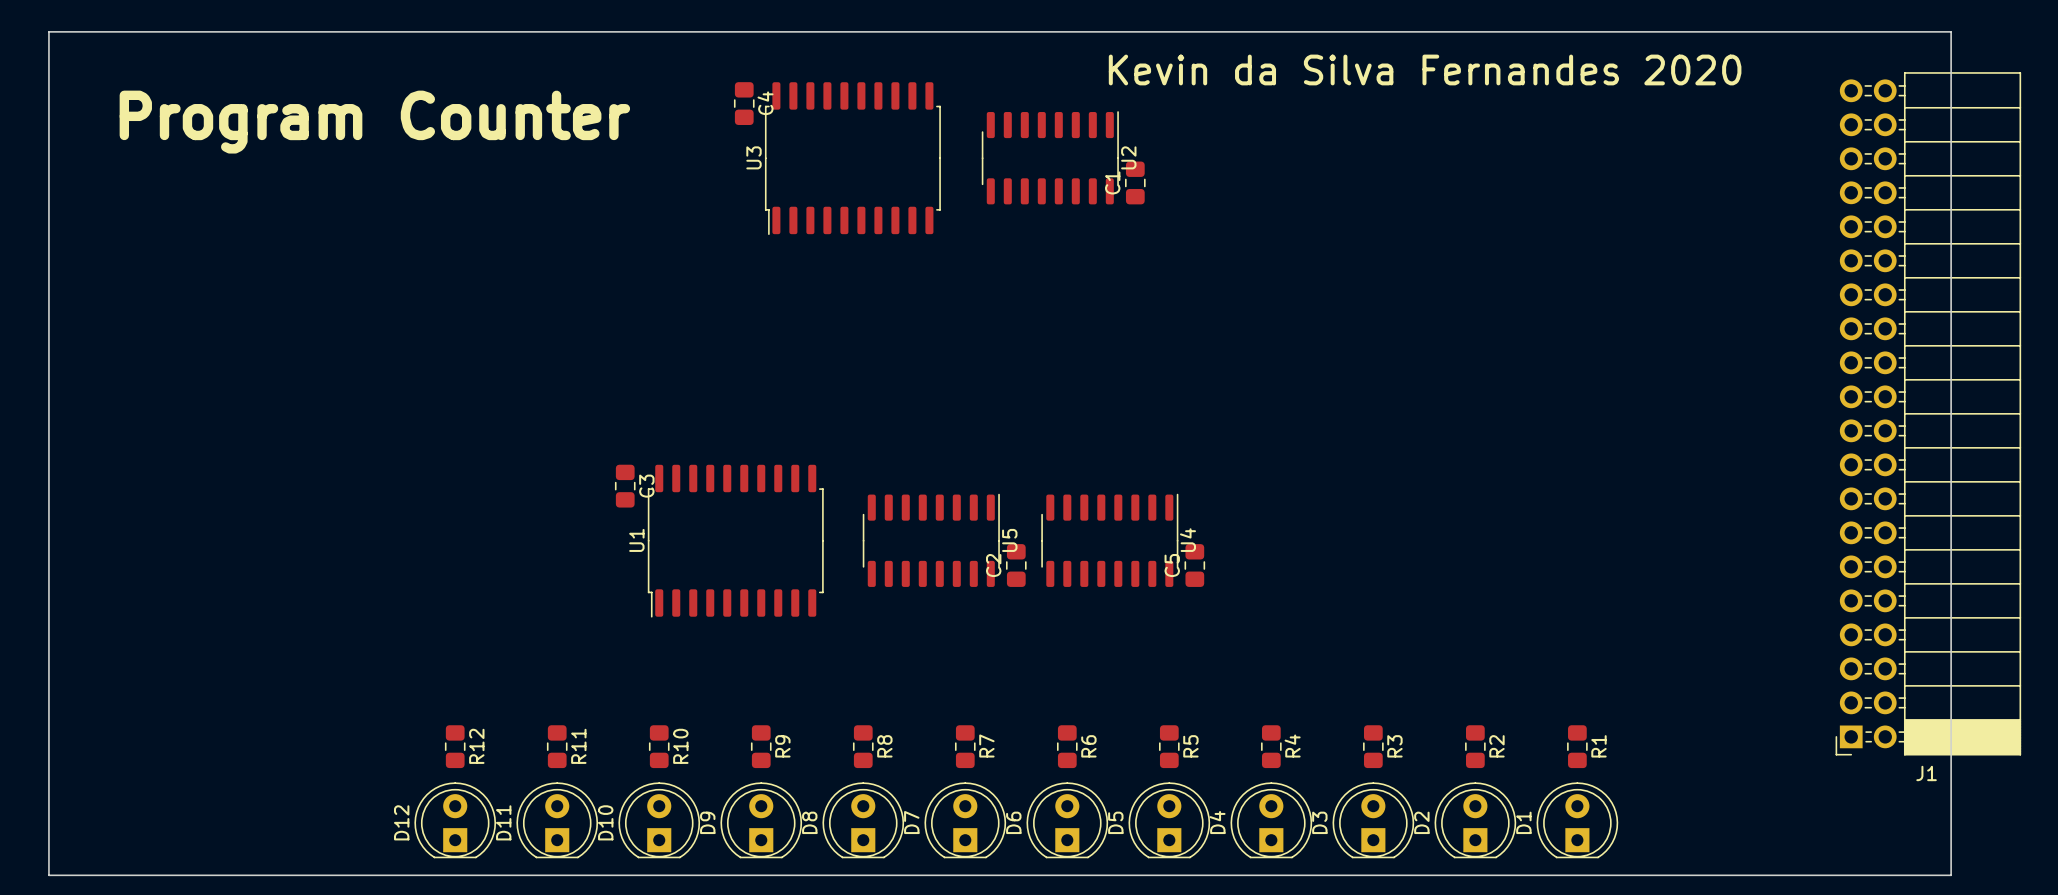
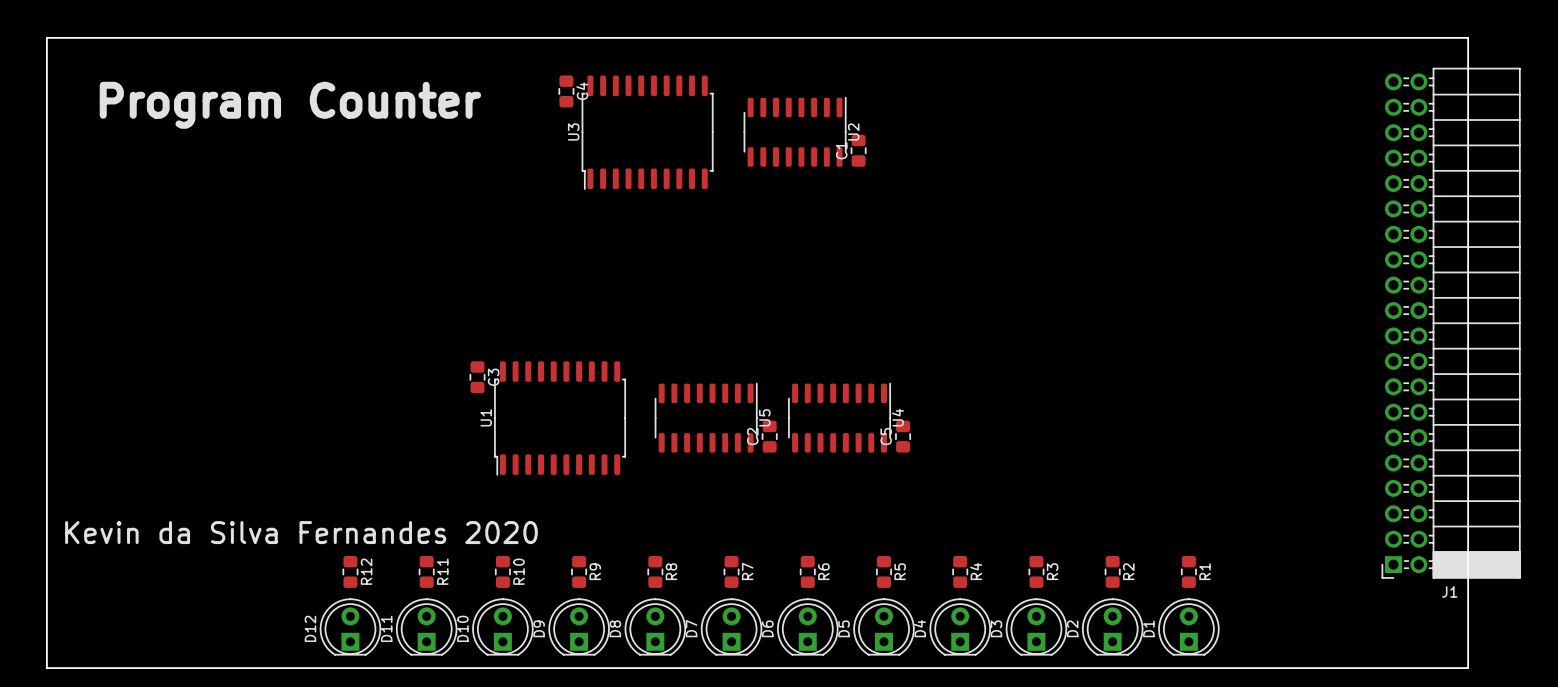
text: Kevin da Silva Fernandes 2020 (1425, 69) -> none
text: none -> Kevin da Silva Fernandes 2020 (301, 532)

